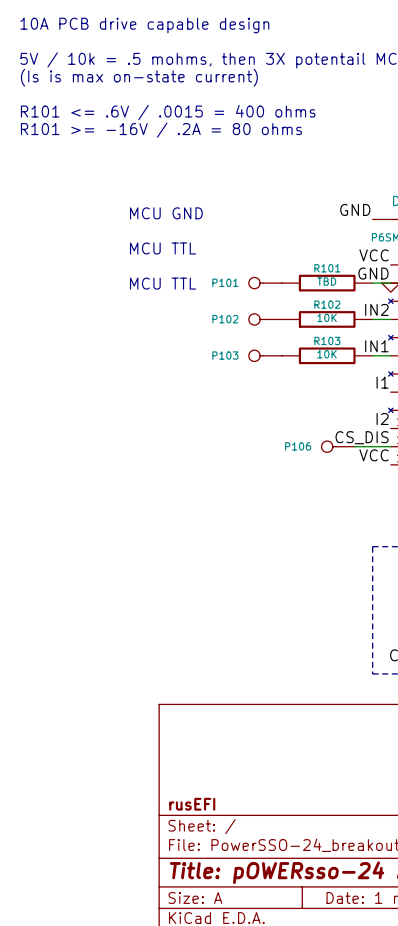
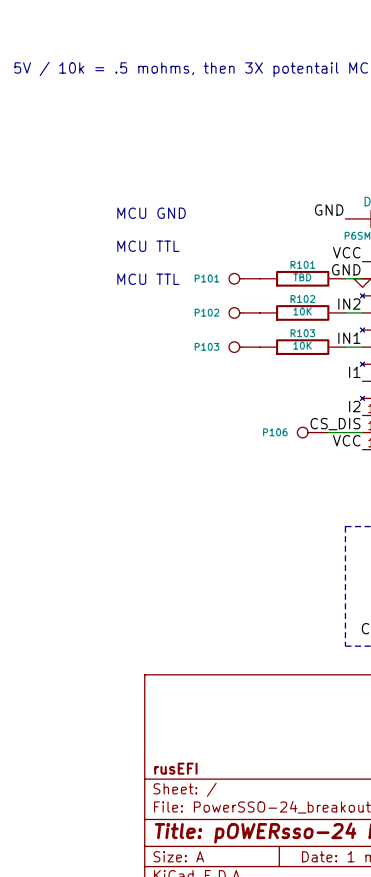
text: 10A PCB drive capable design (144, 25) -> none
text: (Is is max on-state current) (139, 77) -> none
text: R101 <= .6V / .0015 = 400 ohms (168, 112) -> none
text: R101 >= -16V / .2A = 80 ohms (161, 130) -> none

